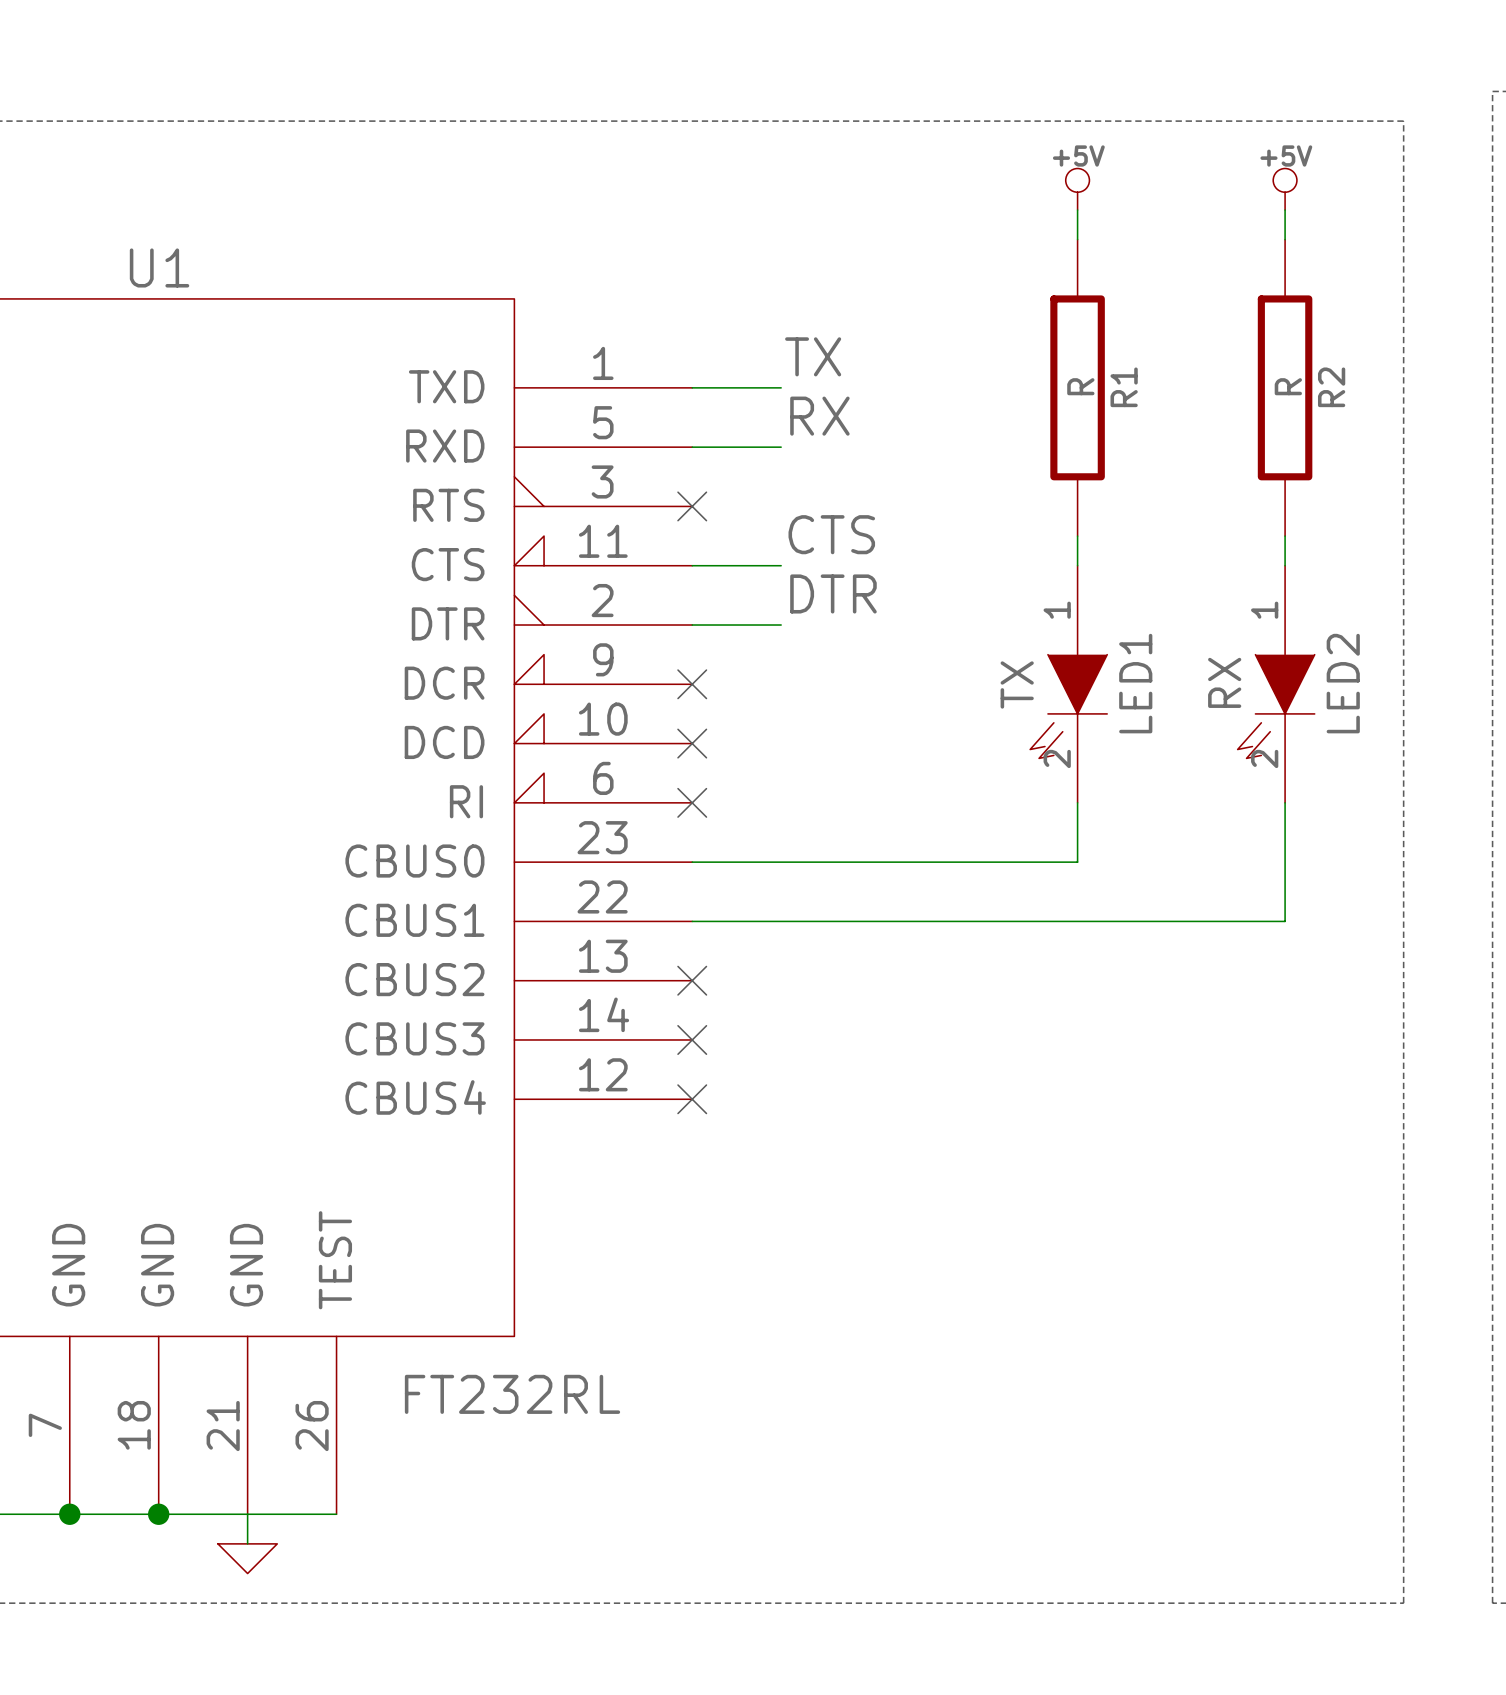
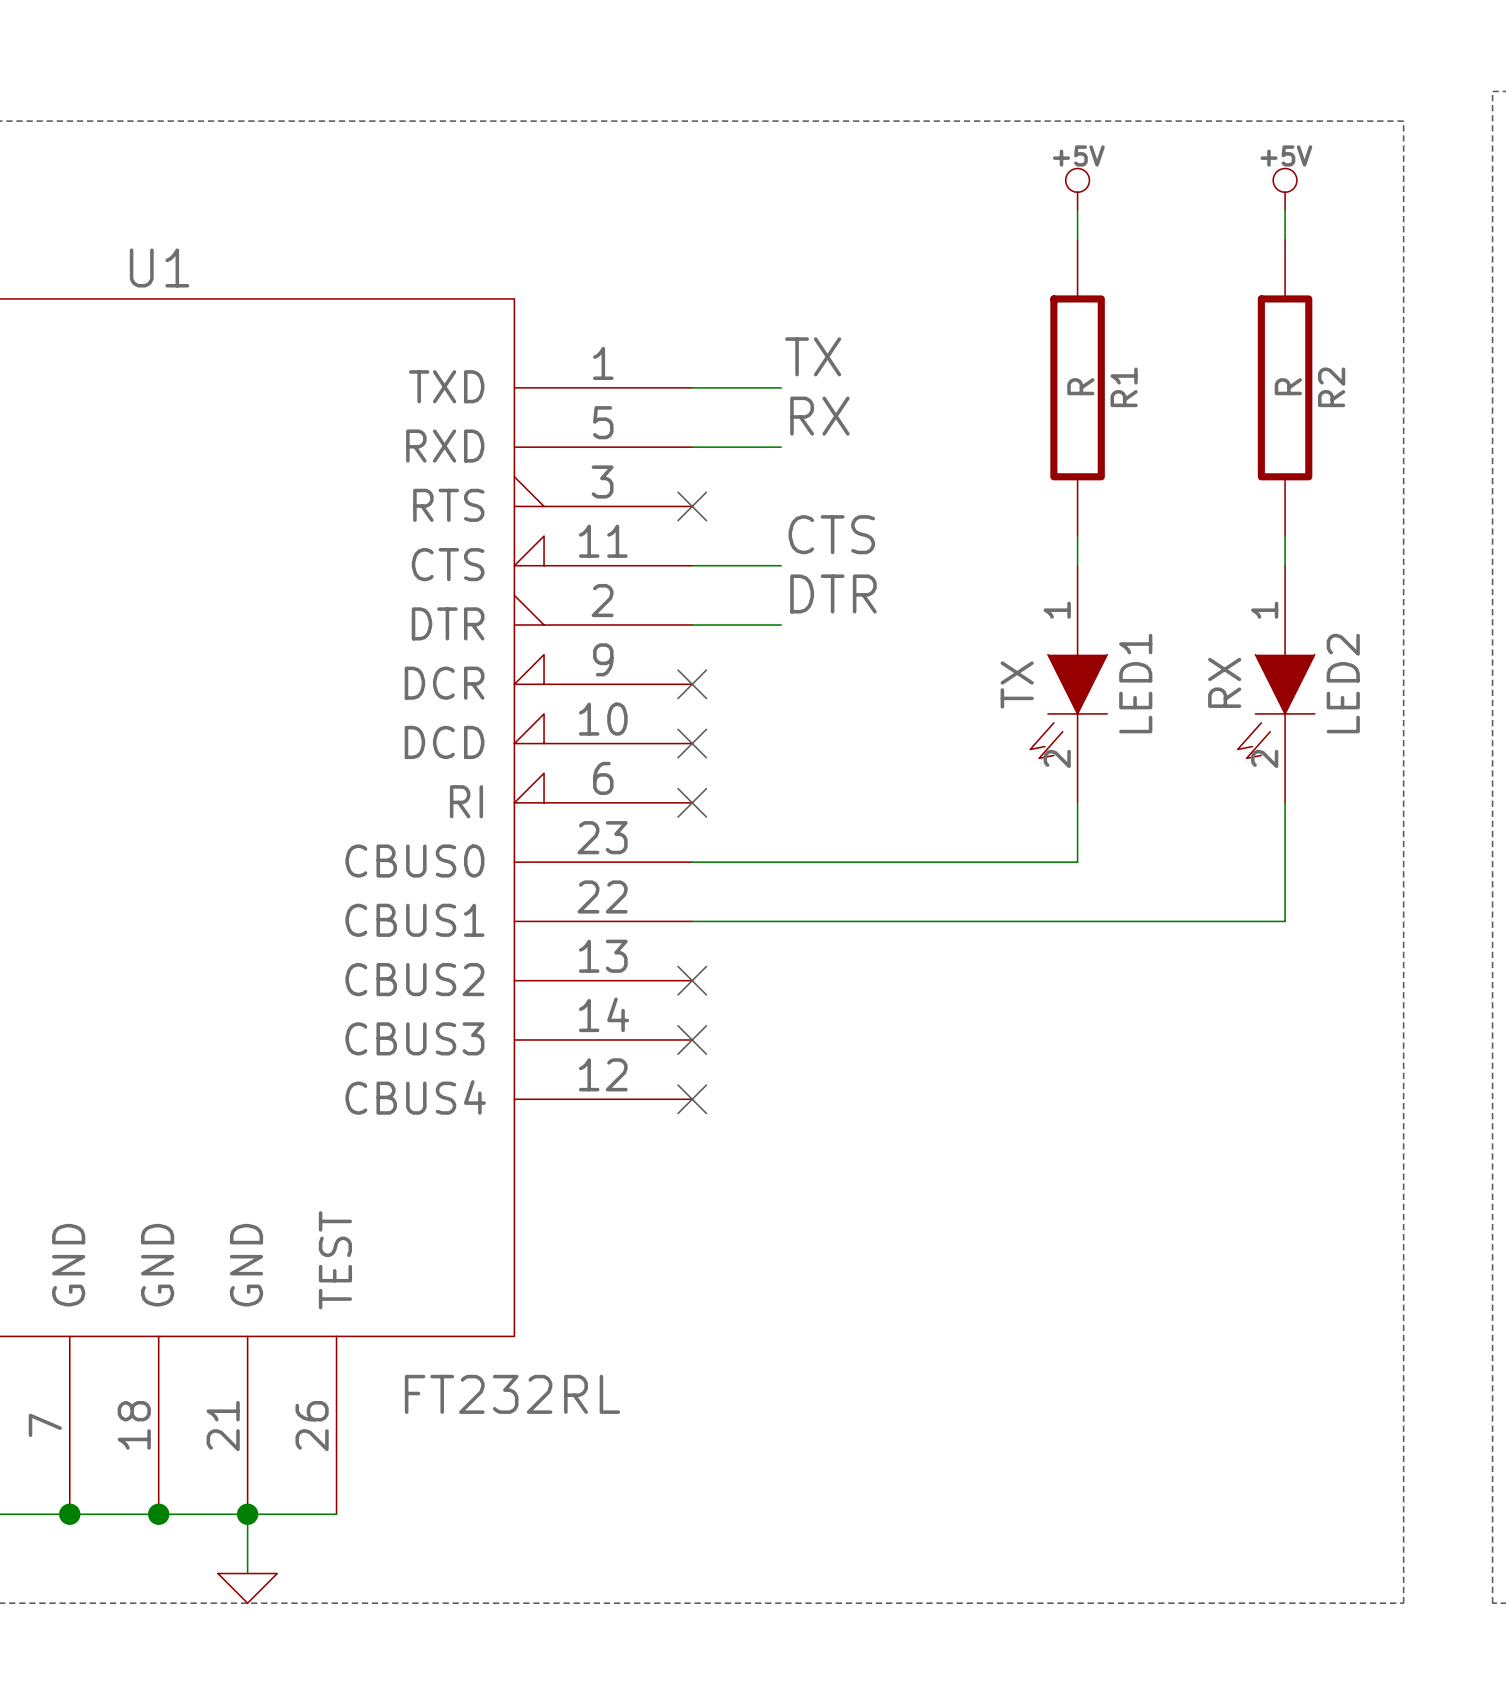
junction: none -> (247, 1514)
wire: none -> (247, 1543) (247, 1573)
power symbol position: (247, 1558) -> (247, 1588)

